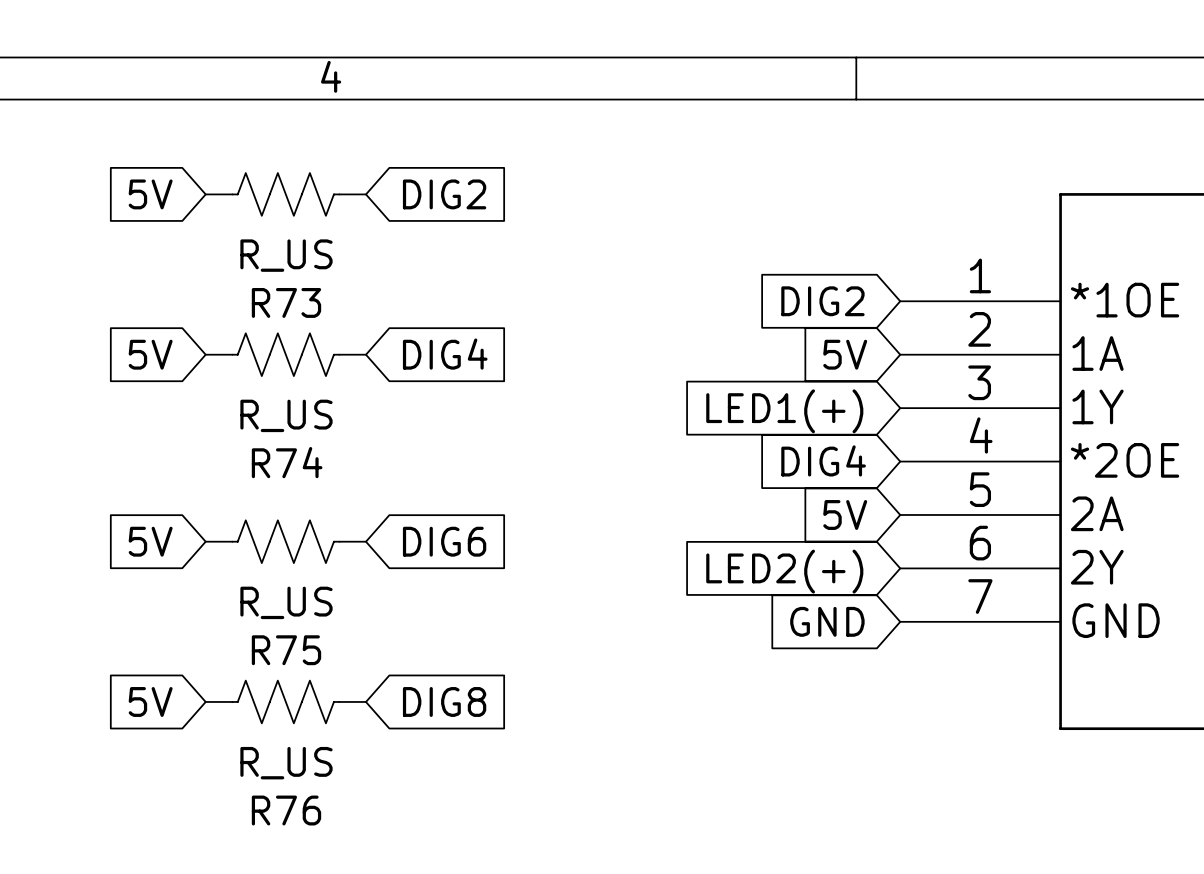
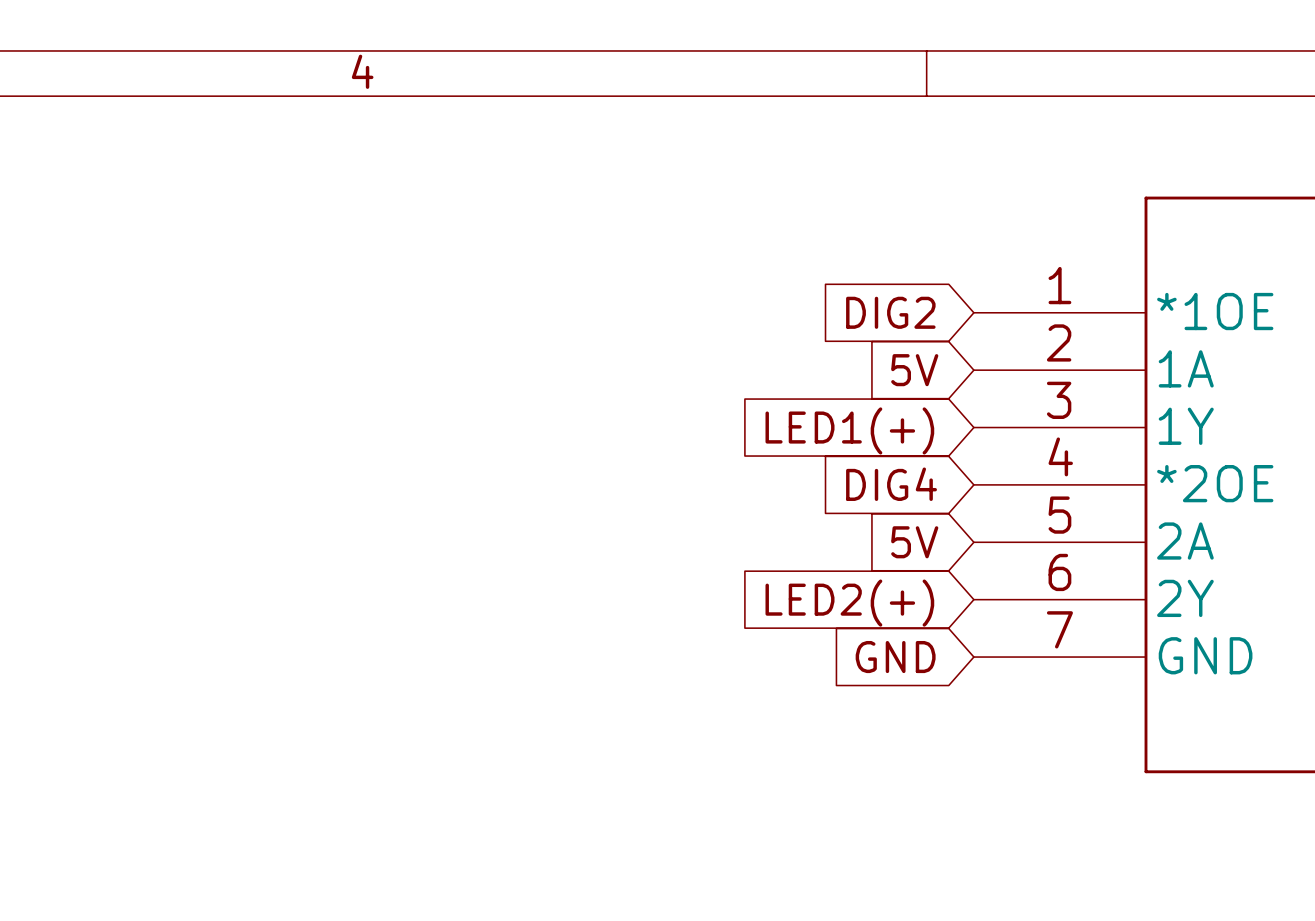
global label: 5V (150, 194) -> none
R73: R_US (285, 194) -> none
global label: DIG2 (444, 194) -> none
global label: 5V (150, 354) -> none
R74: R_US (285, 354) -> none
global label: DIG4 (445, 354) -> none
global label: 5V (150, 541) -> none
R75: R_US (285, 541) -> none
global label: DIG6 (444, 541) -> none
global label: 5V (150, 701) -> none
R76: R_US (285, 701) -> none
global label: DIG8 (444, 701) -> none

